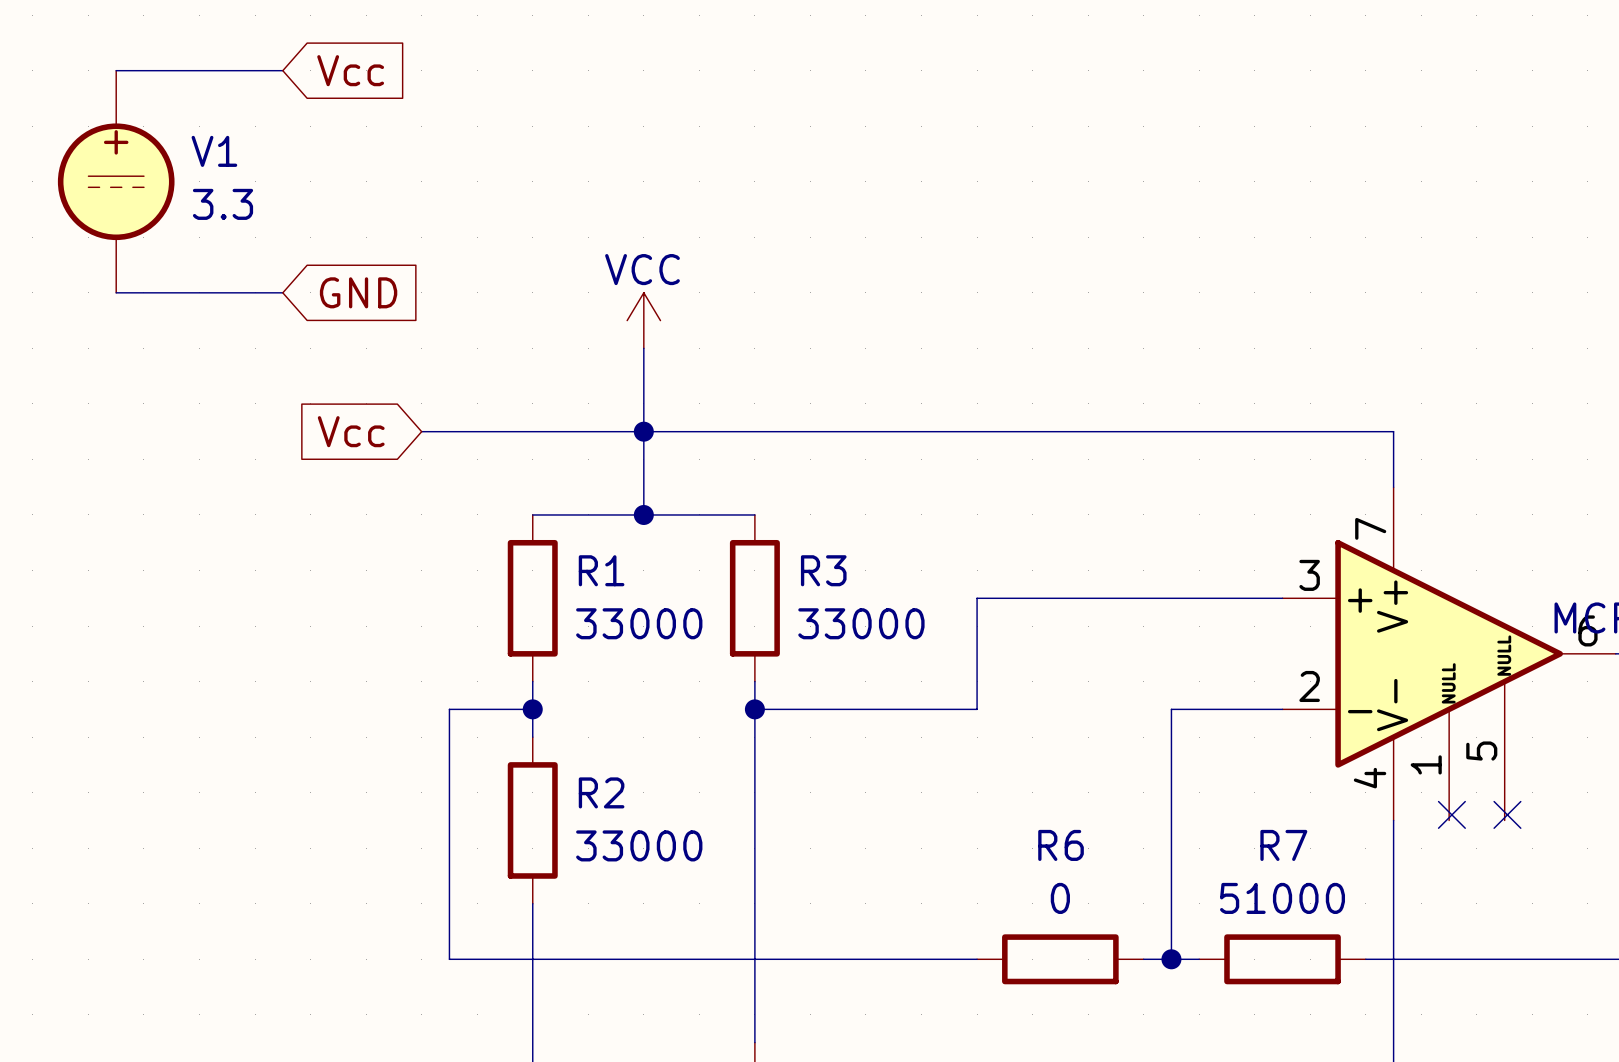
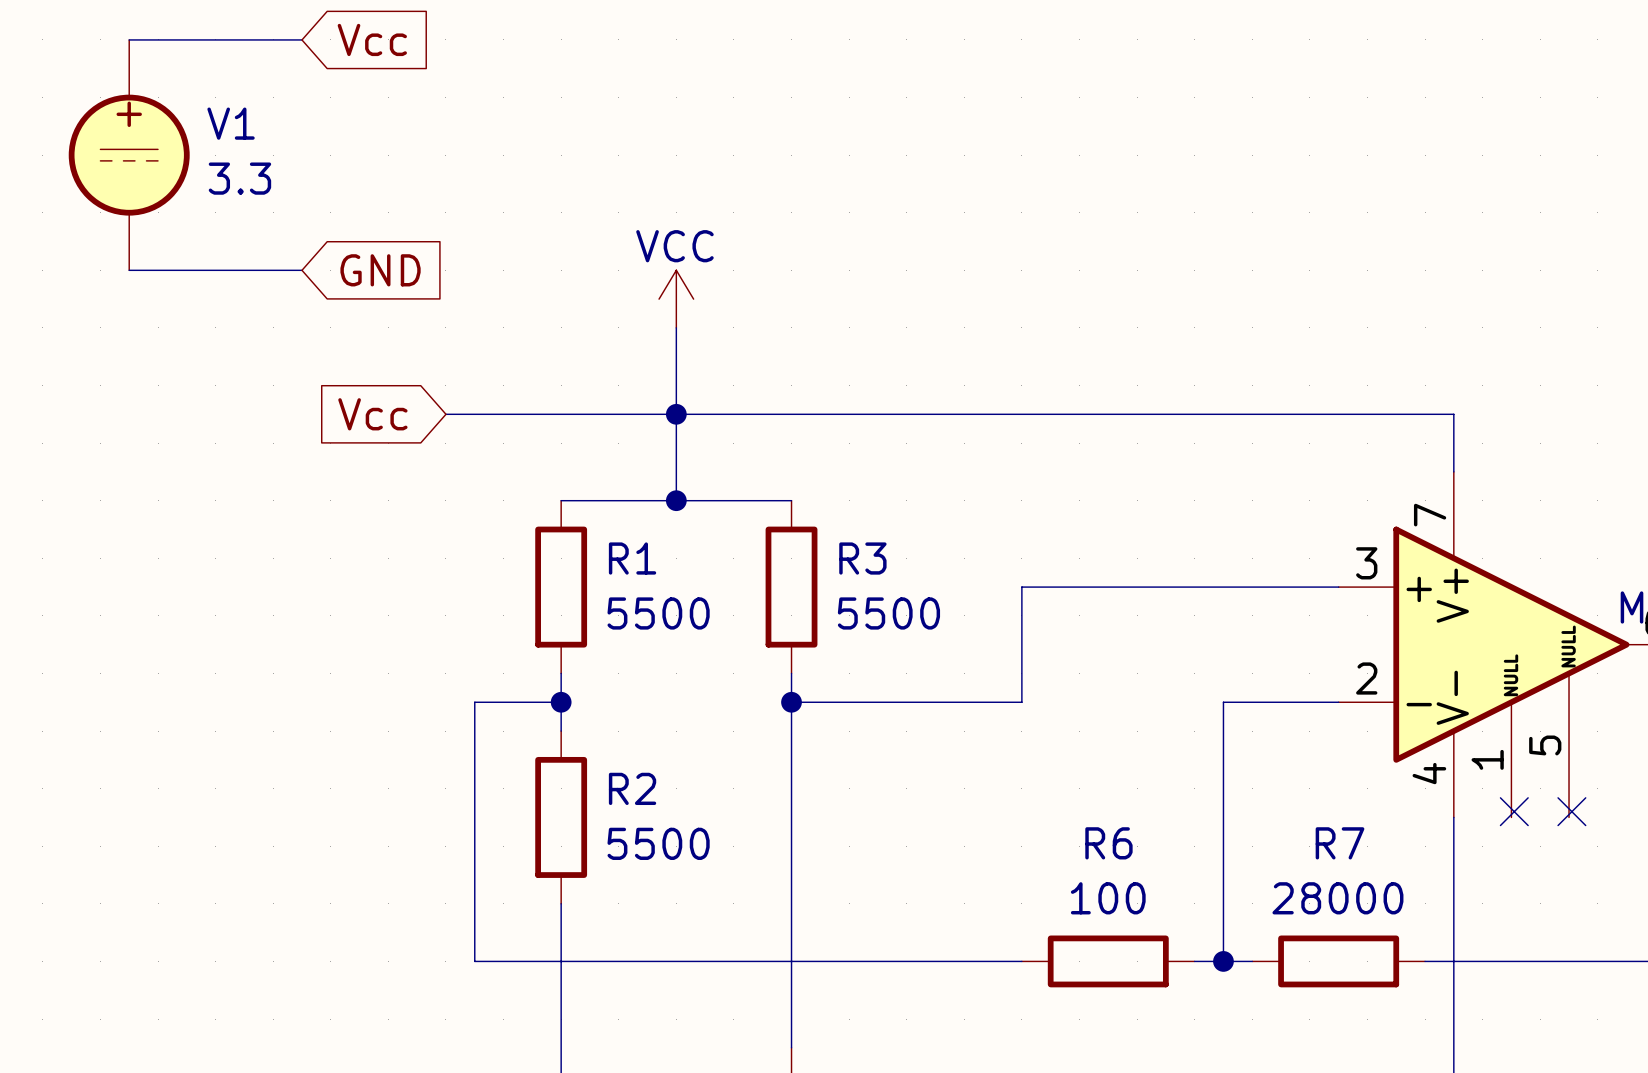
R1 value: 33000 (639, 623) -> 5500 (658, 613)
R3 value: 33000 (861, 623) -> 5500 (888, 613)
R2 value: 33000 (639, 845) -> 5500 (658, 843)
R6 value: 0 (1060, 898) -> 100 (1108, 898)
R7 value: 51000 (1282, 898) -> 28000 (1337, 898)

